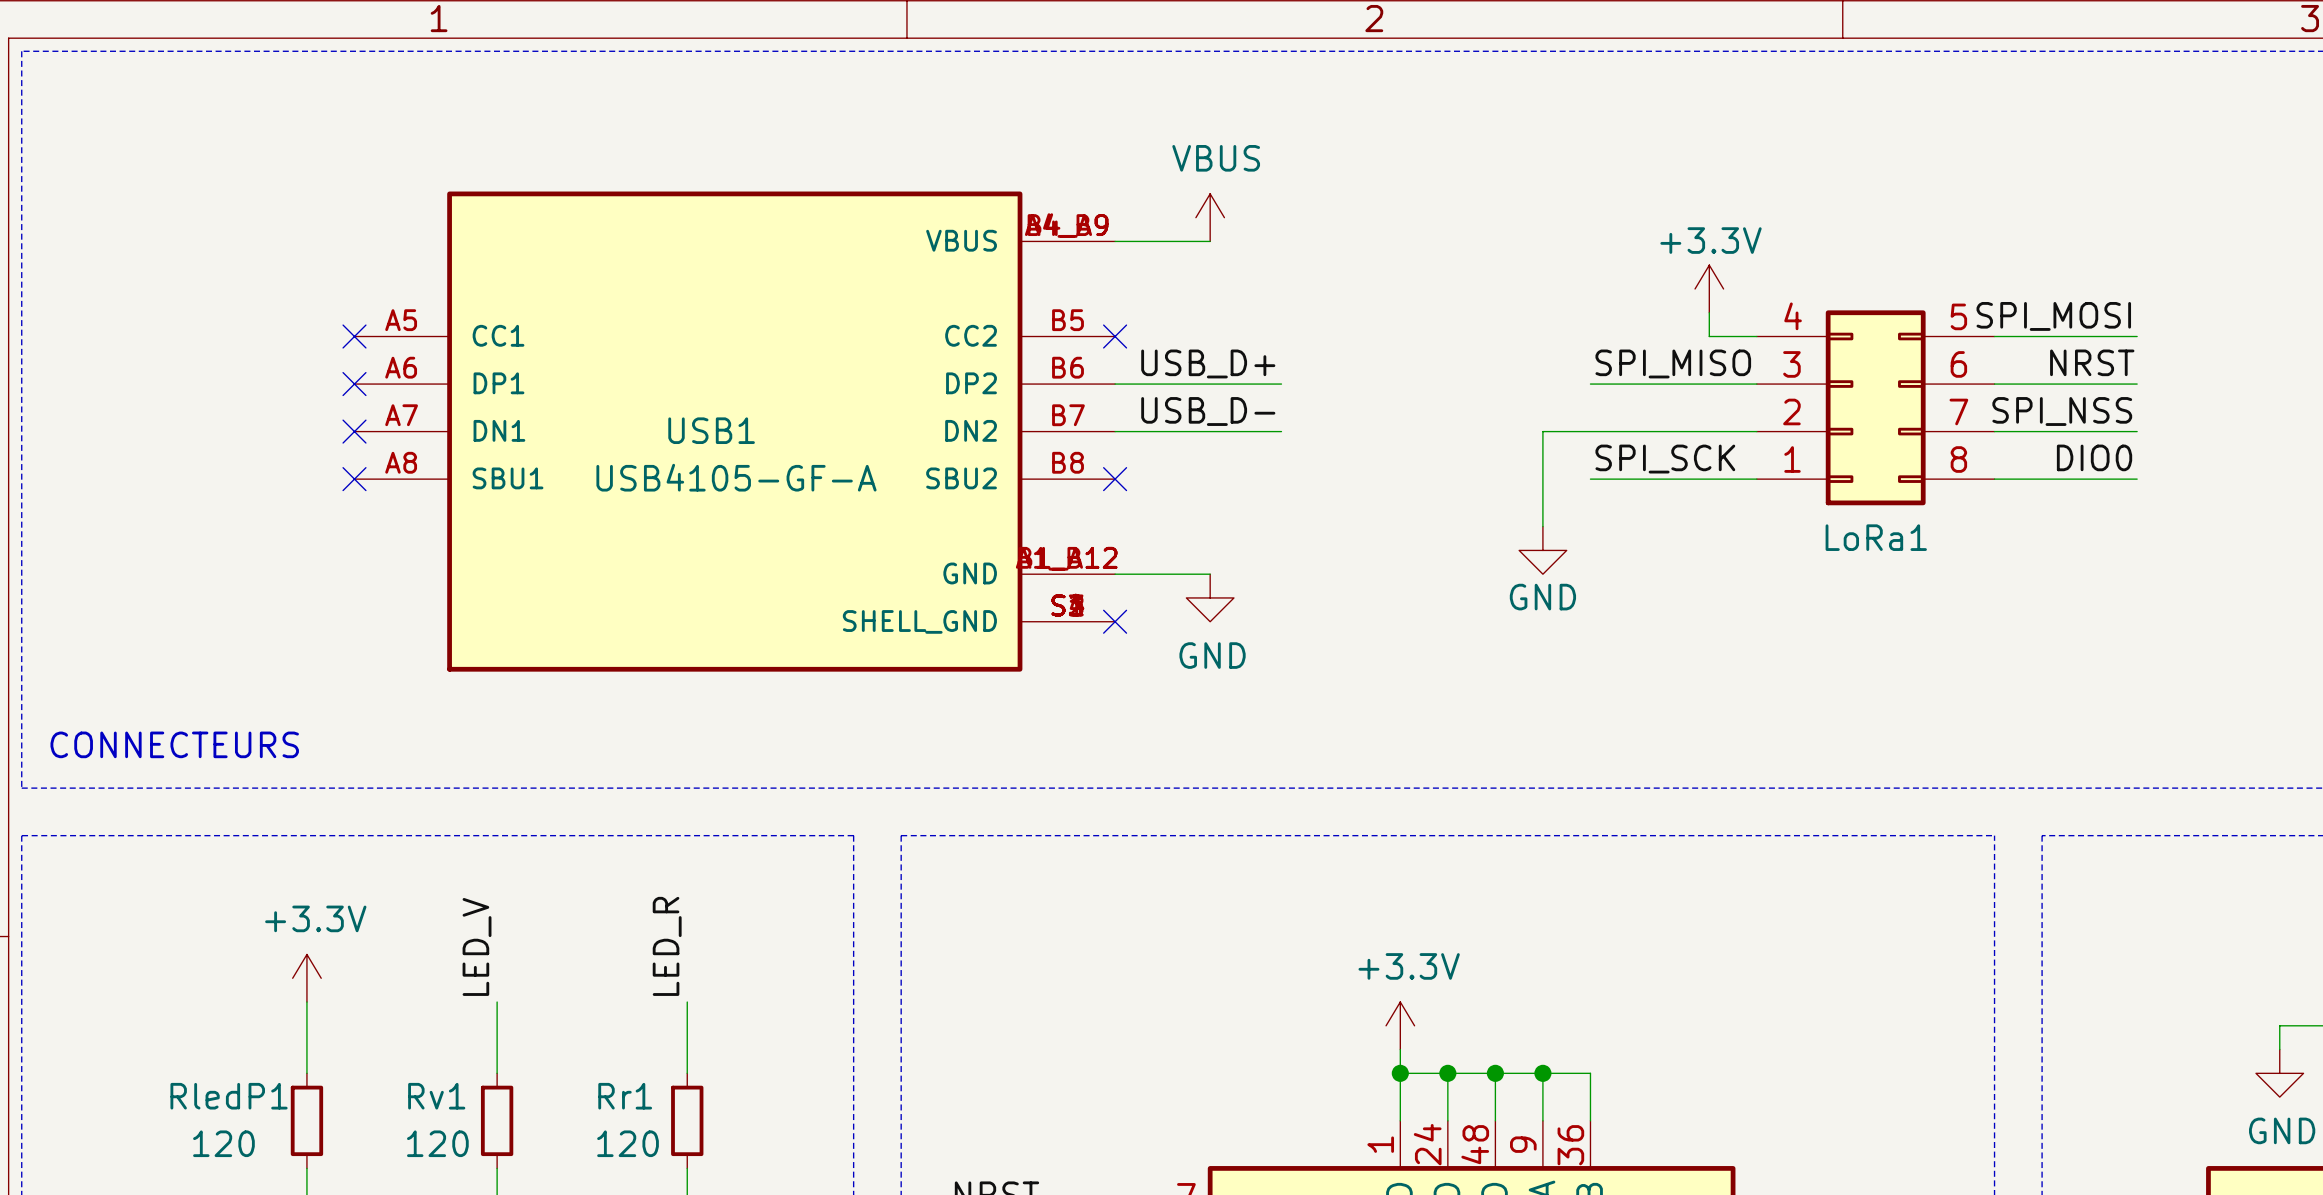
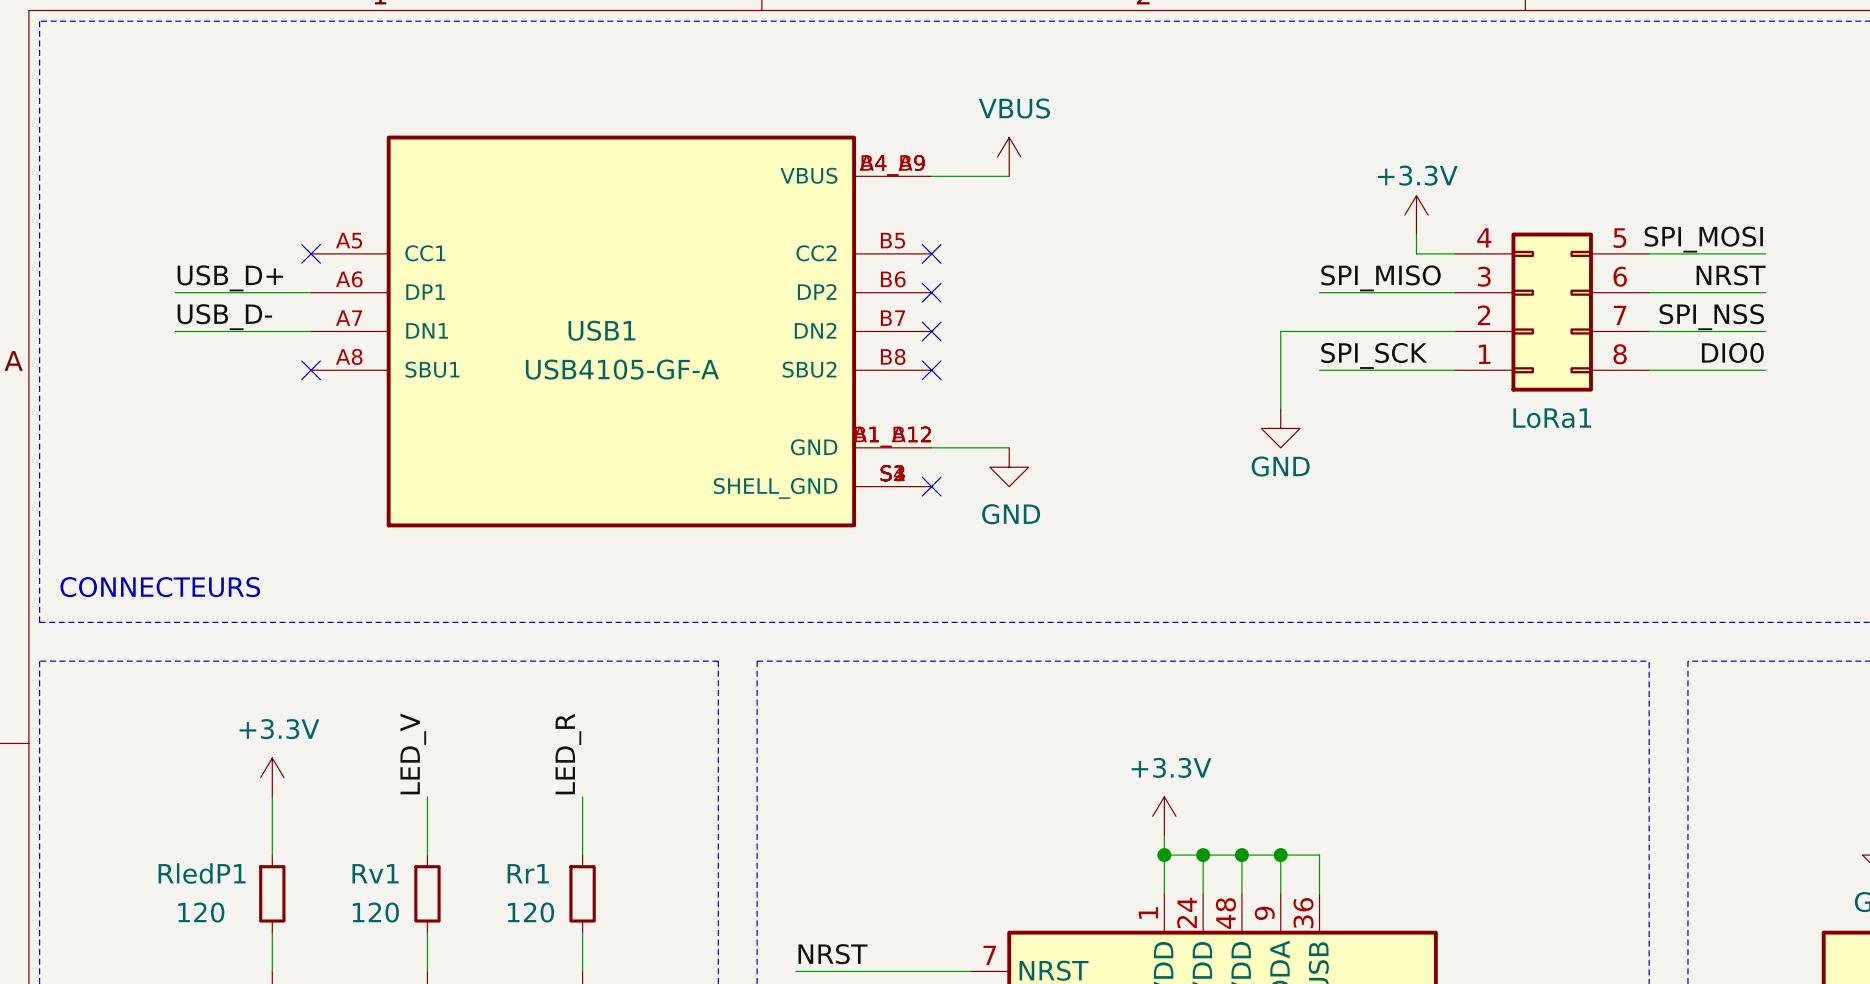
label: none -> USB_D+ (230, 278)
label: USB_D+ (1208, 363) -> none
wire: none -> (175, 292) (311, 292)
no-connect mark: (354, 384) -> none
wire: (1115, 384) (1281, 384) -> none
no-connect mark: none -> (931, 292)
label: none -> USB_D- (224, 317)
label: USB_D- (1208, 411) -> none
wire: none -> (175, 331) (311, 331)
no-connect mark: (354, 431) -> none
wire: (1115, 431) (1281, 431) -> none
no-connect mark: none -> (931, 331)

